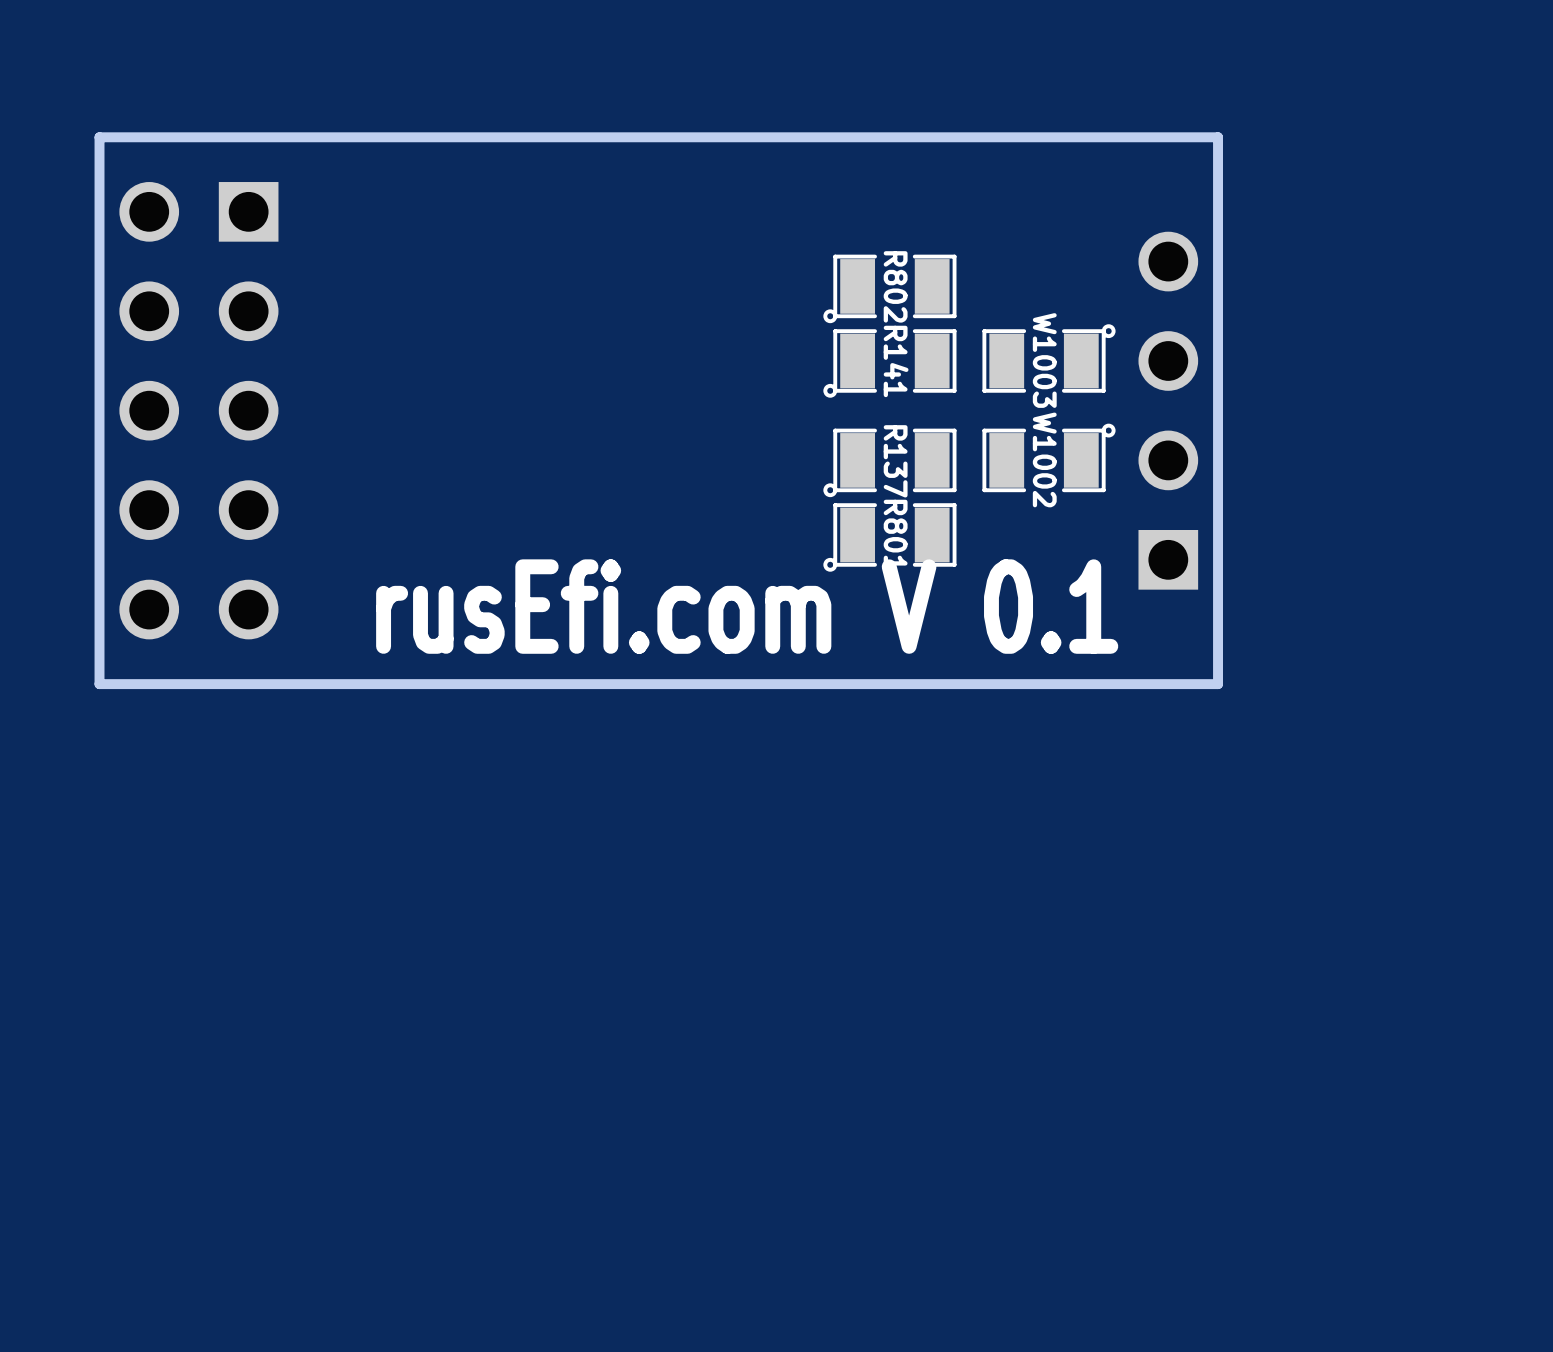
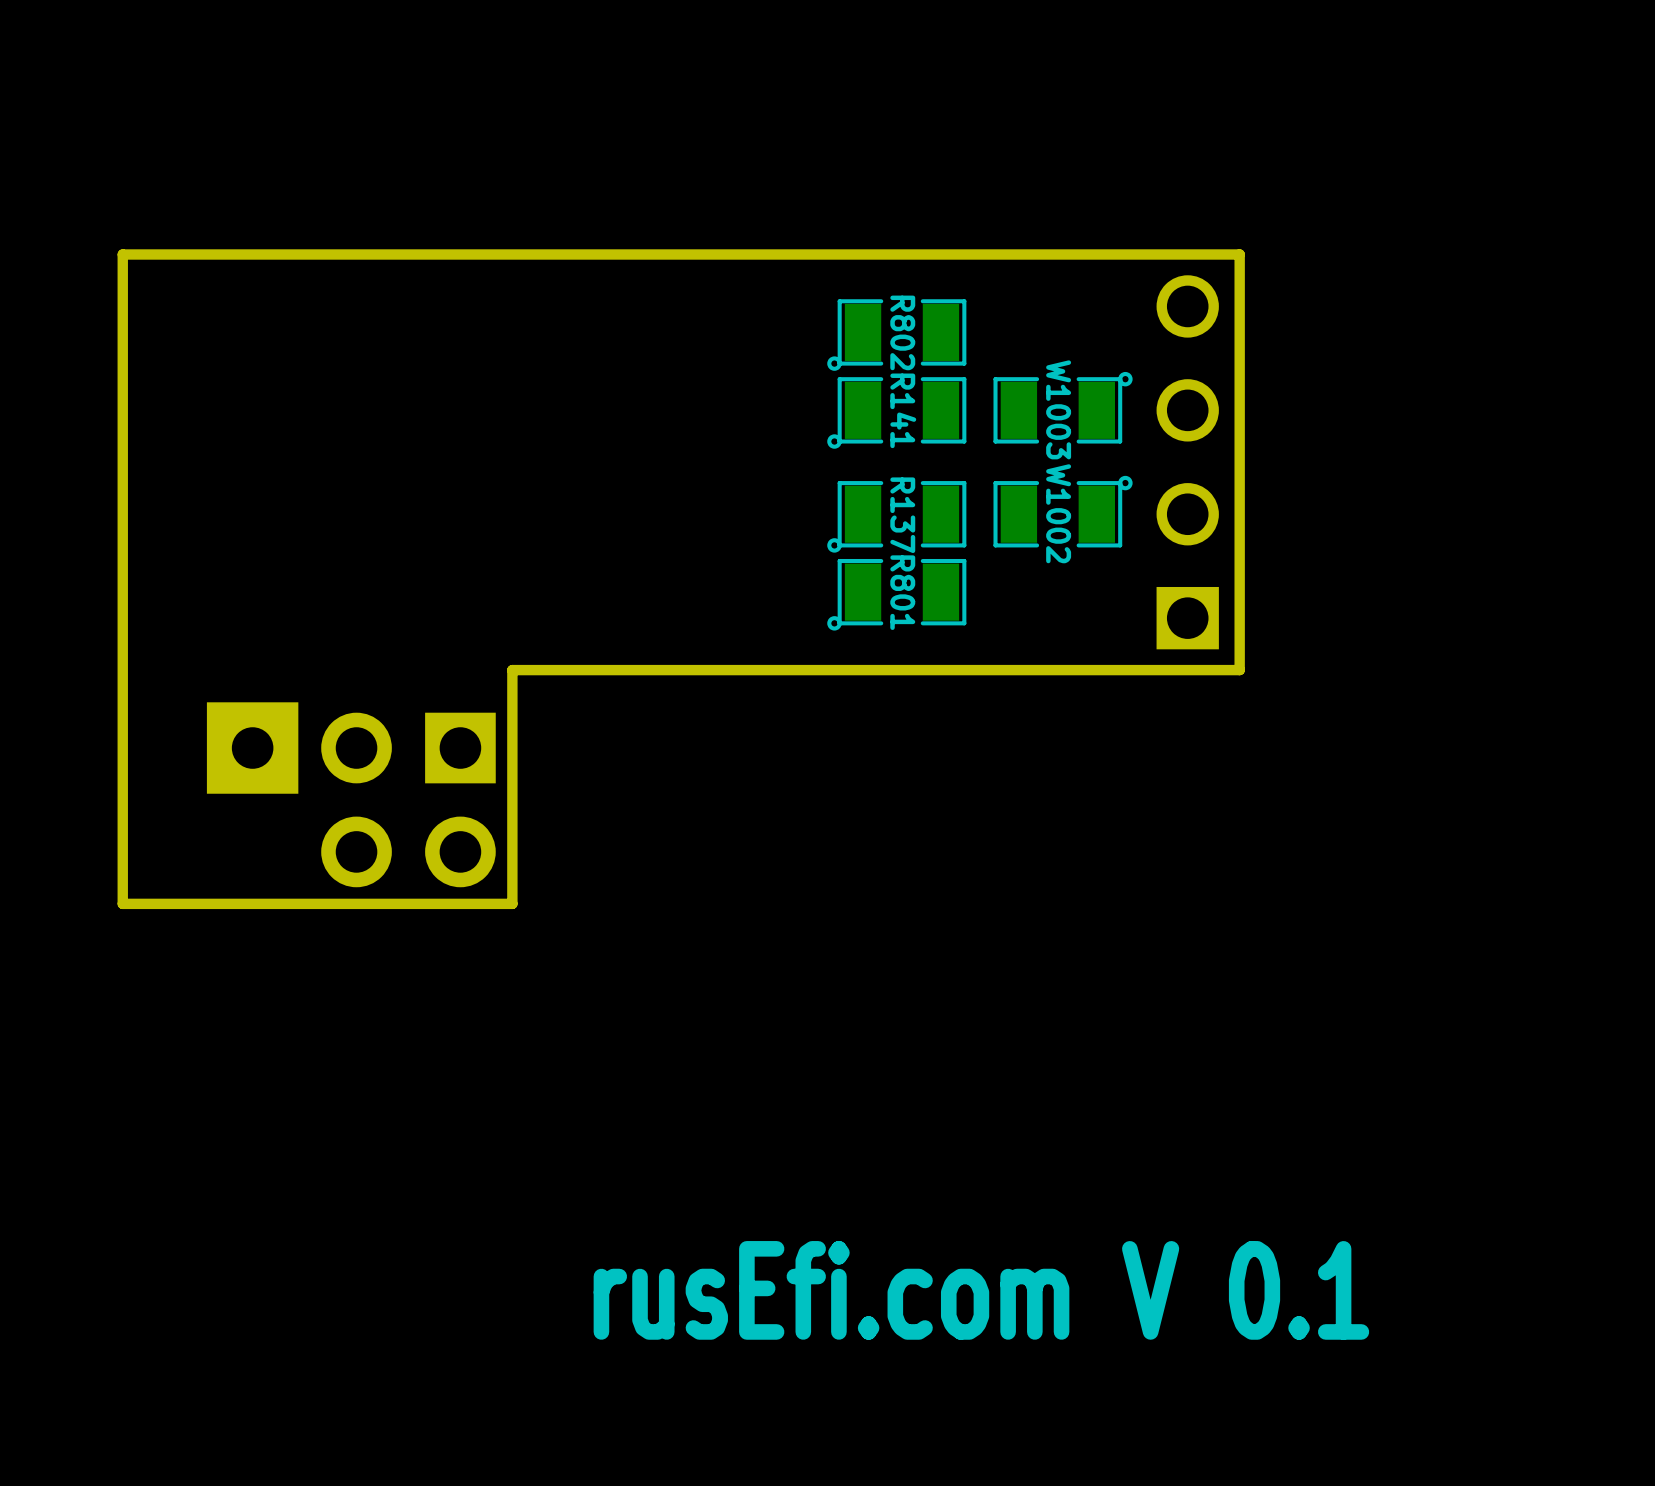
board edge: (1218, 211) (1218, 137) (99, 137) (99, 684) (1218, 684) (1218, 609) -> (1239, 254) (122, 254) (122, 903) (512, 903) (512, 670) (1239, 670)
part: (198, 410) -> none
text position: rusEfi.com V 0.1 (747, 606) -> rusEfi.com V 0.1 (981, 1290)
part: none -> (252, 748)
part: none -> (408, 799)

